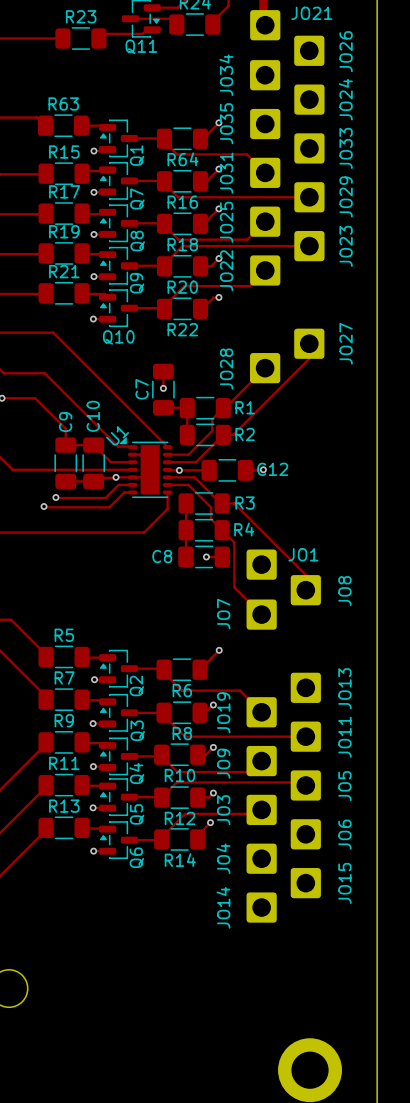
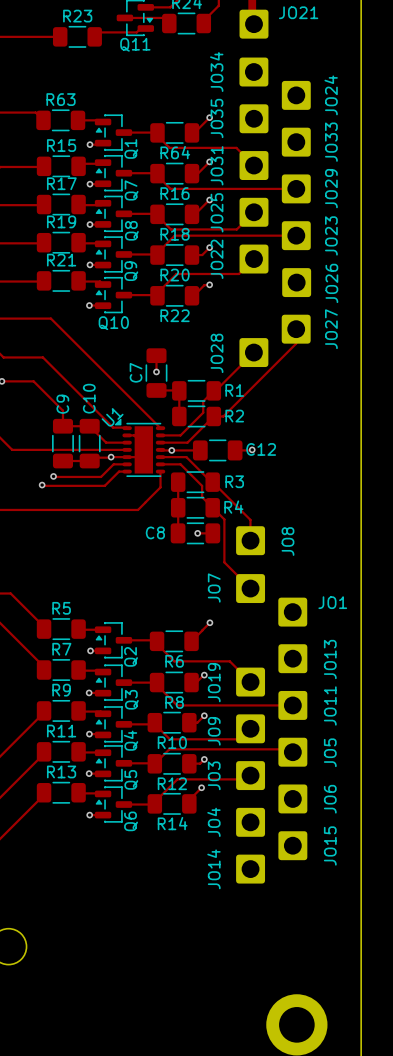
JO26 position: (309, 50) -> (296, 282)
track: (222, 503) (234, 503) (305, 575) (305, 590) -> (212, 482) (250, 519) (250, 541)
JO1 name: JO1 (303, 554) -> JO8 (287, 541)
JO8: (305, 590) -> none
JO1: none -> (292, 612)

